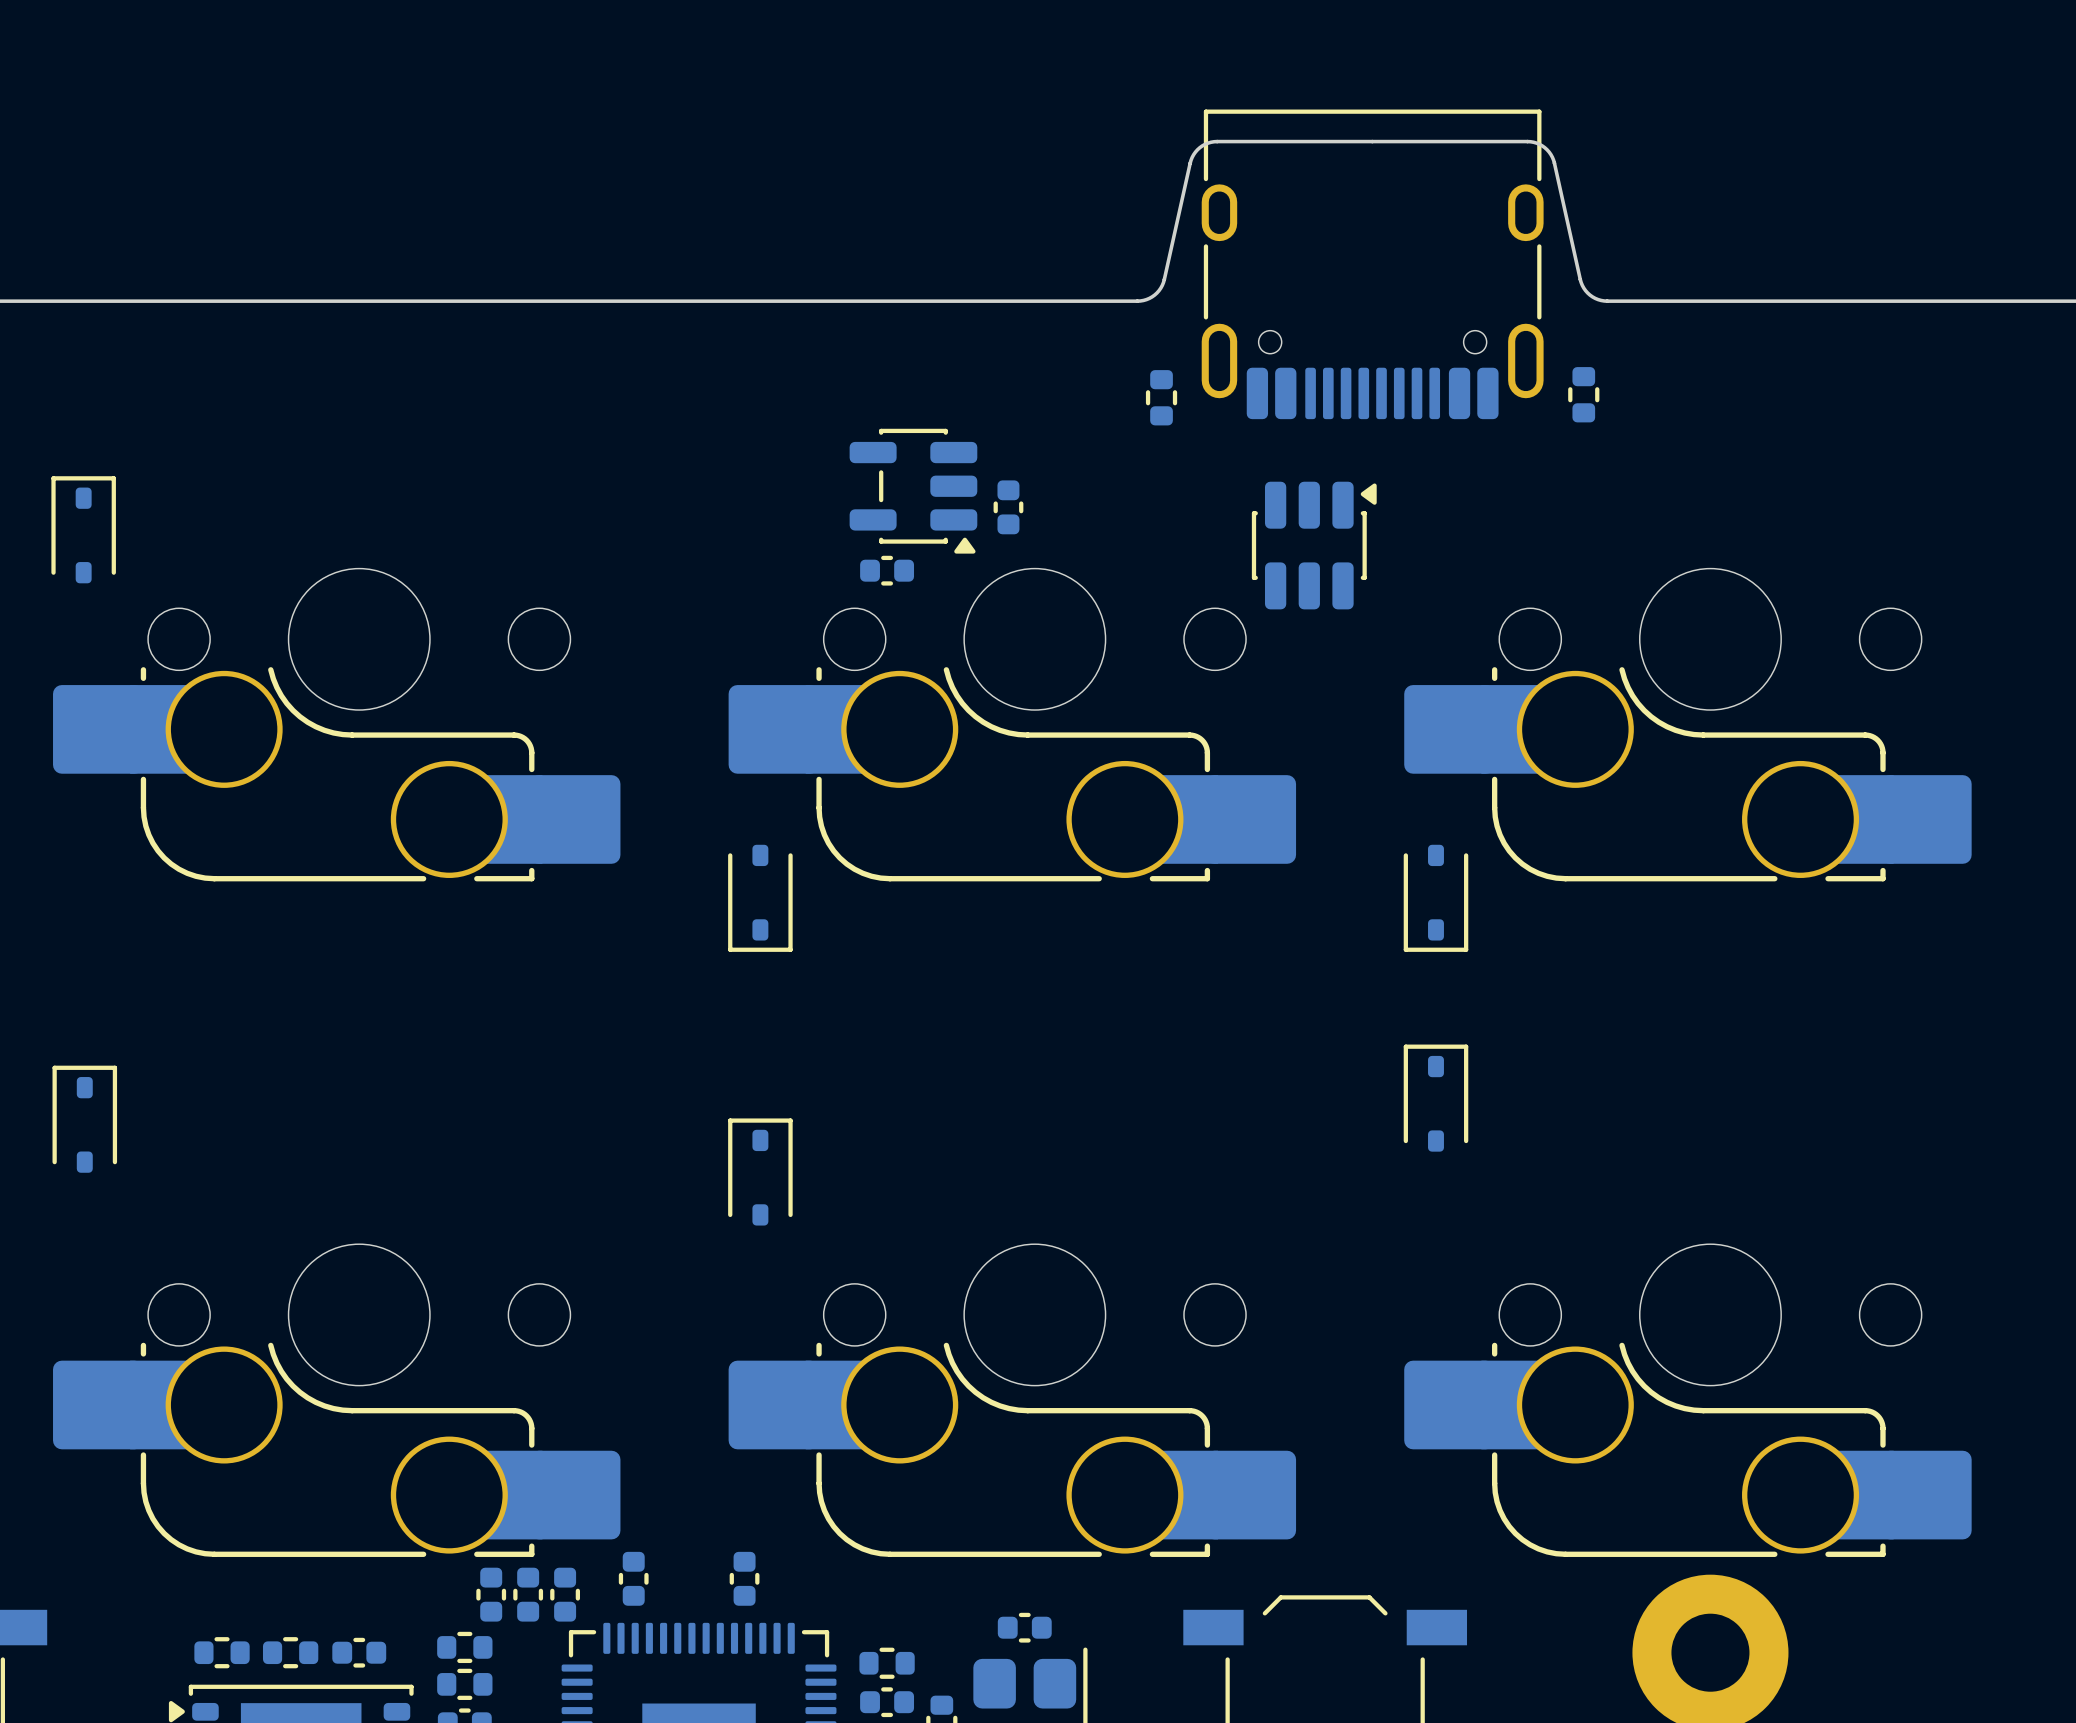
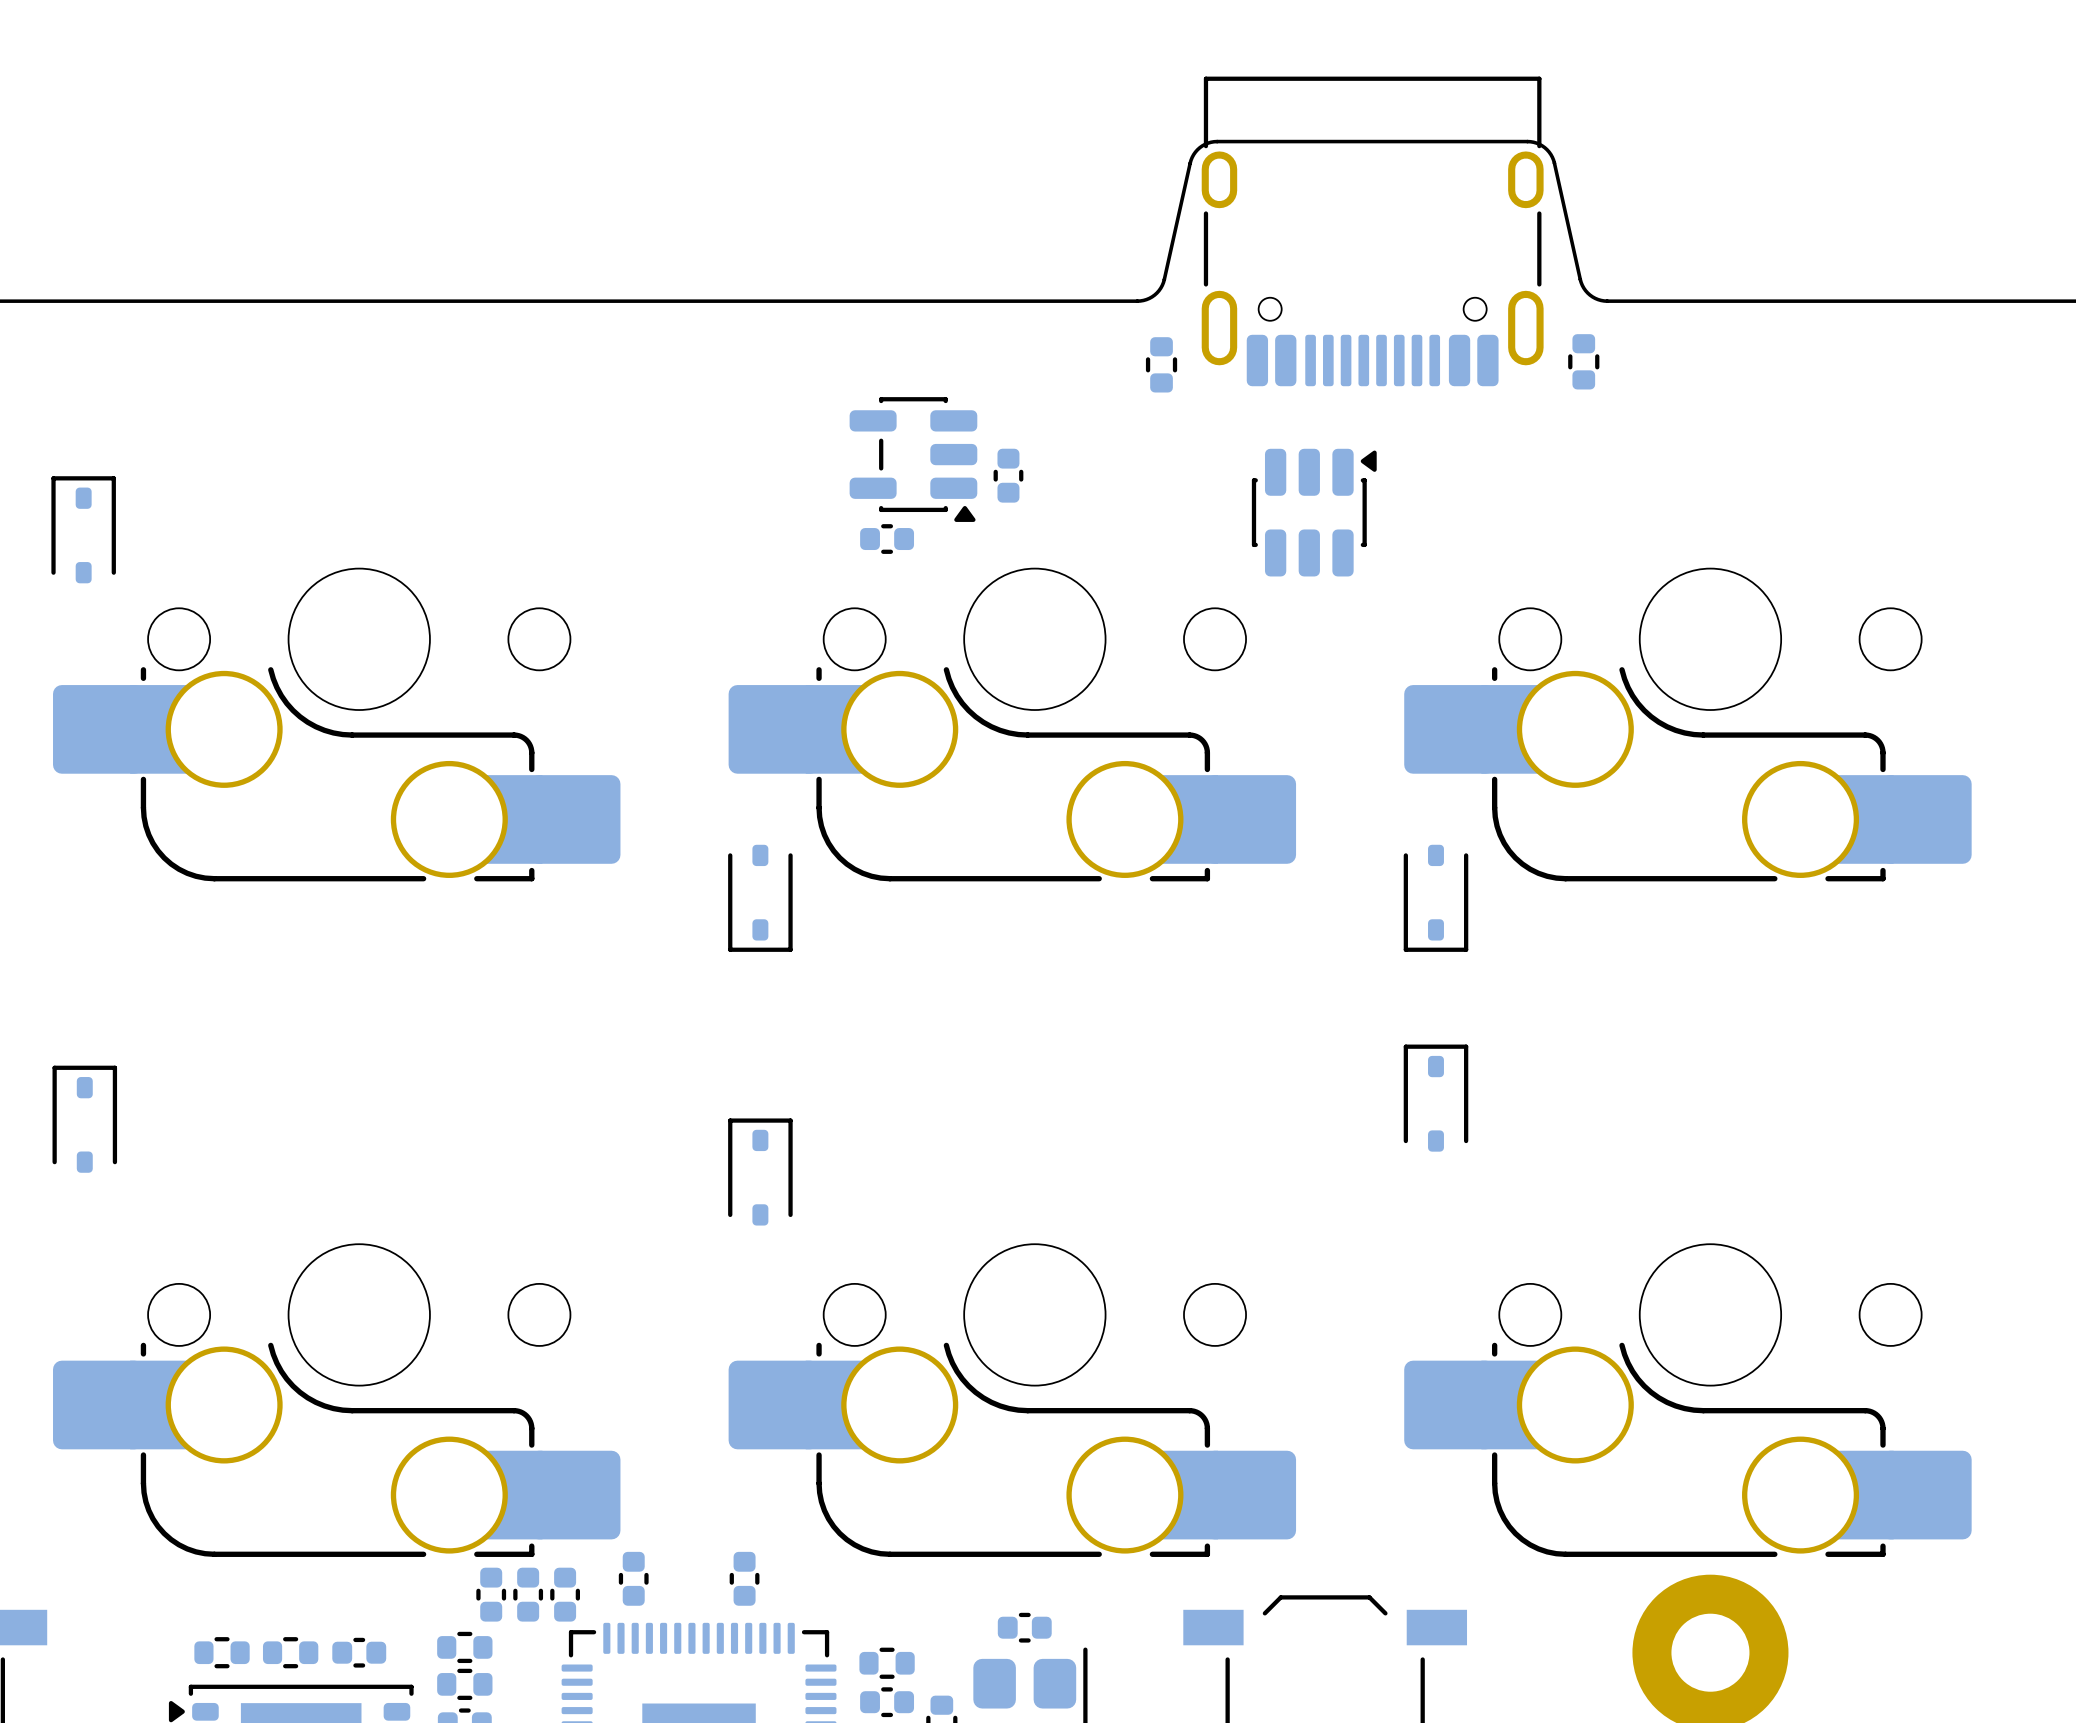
part position: (1372, 264) -> (1372, 231)
part position: (1583, 394) -> (1583, 361)
part position: (1161, 397) -> (1161, 364)
part position: (913, 491) -> (913, 459)
part position: (1008, 507) -> (1008, 475)
part position: (1314, 545) -> (1314, 512)
part position: (887, 570) -> (887, 539)

